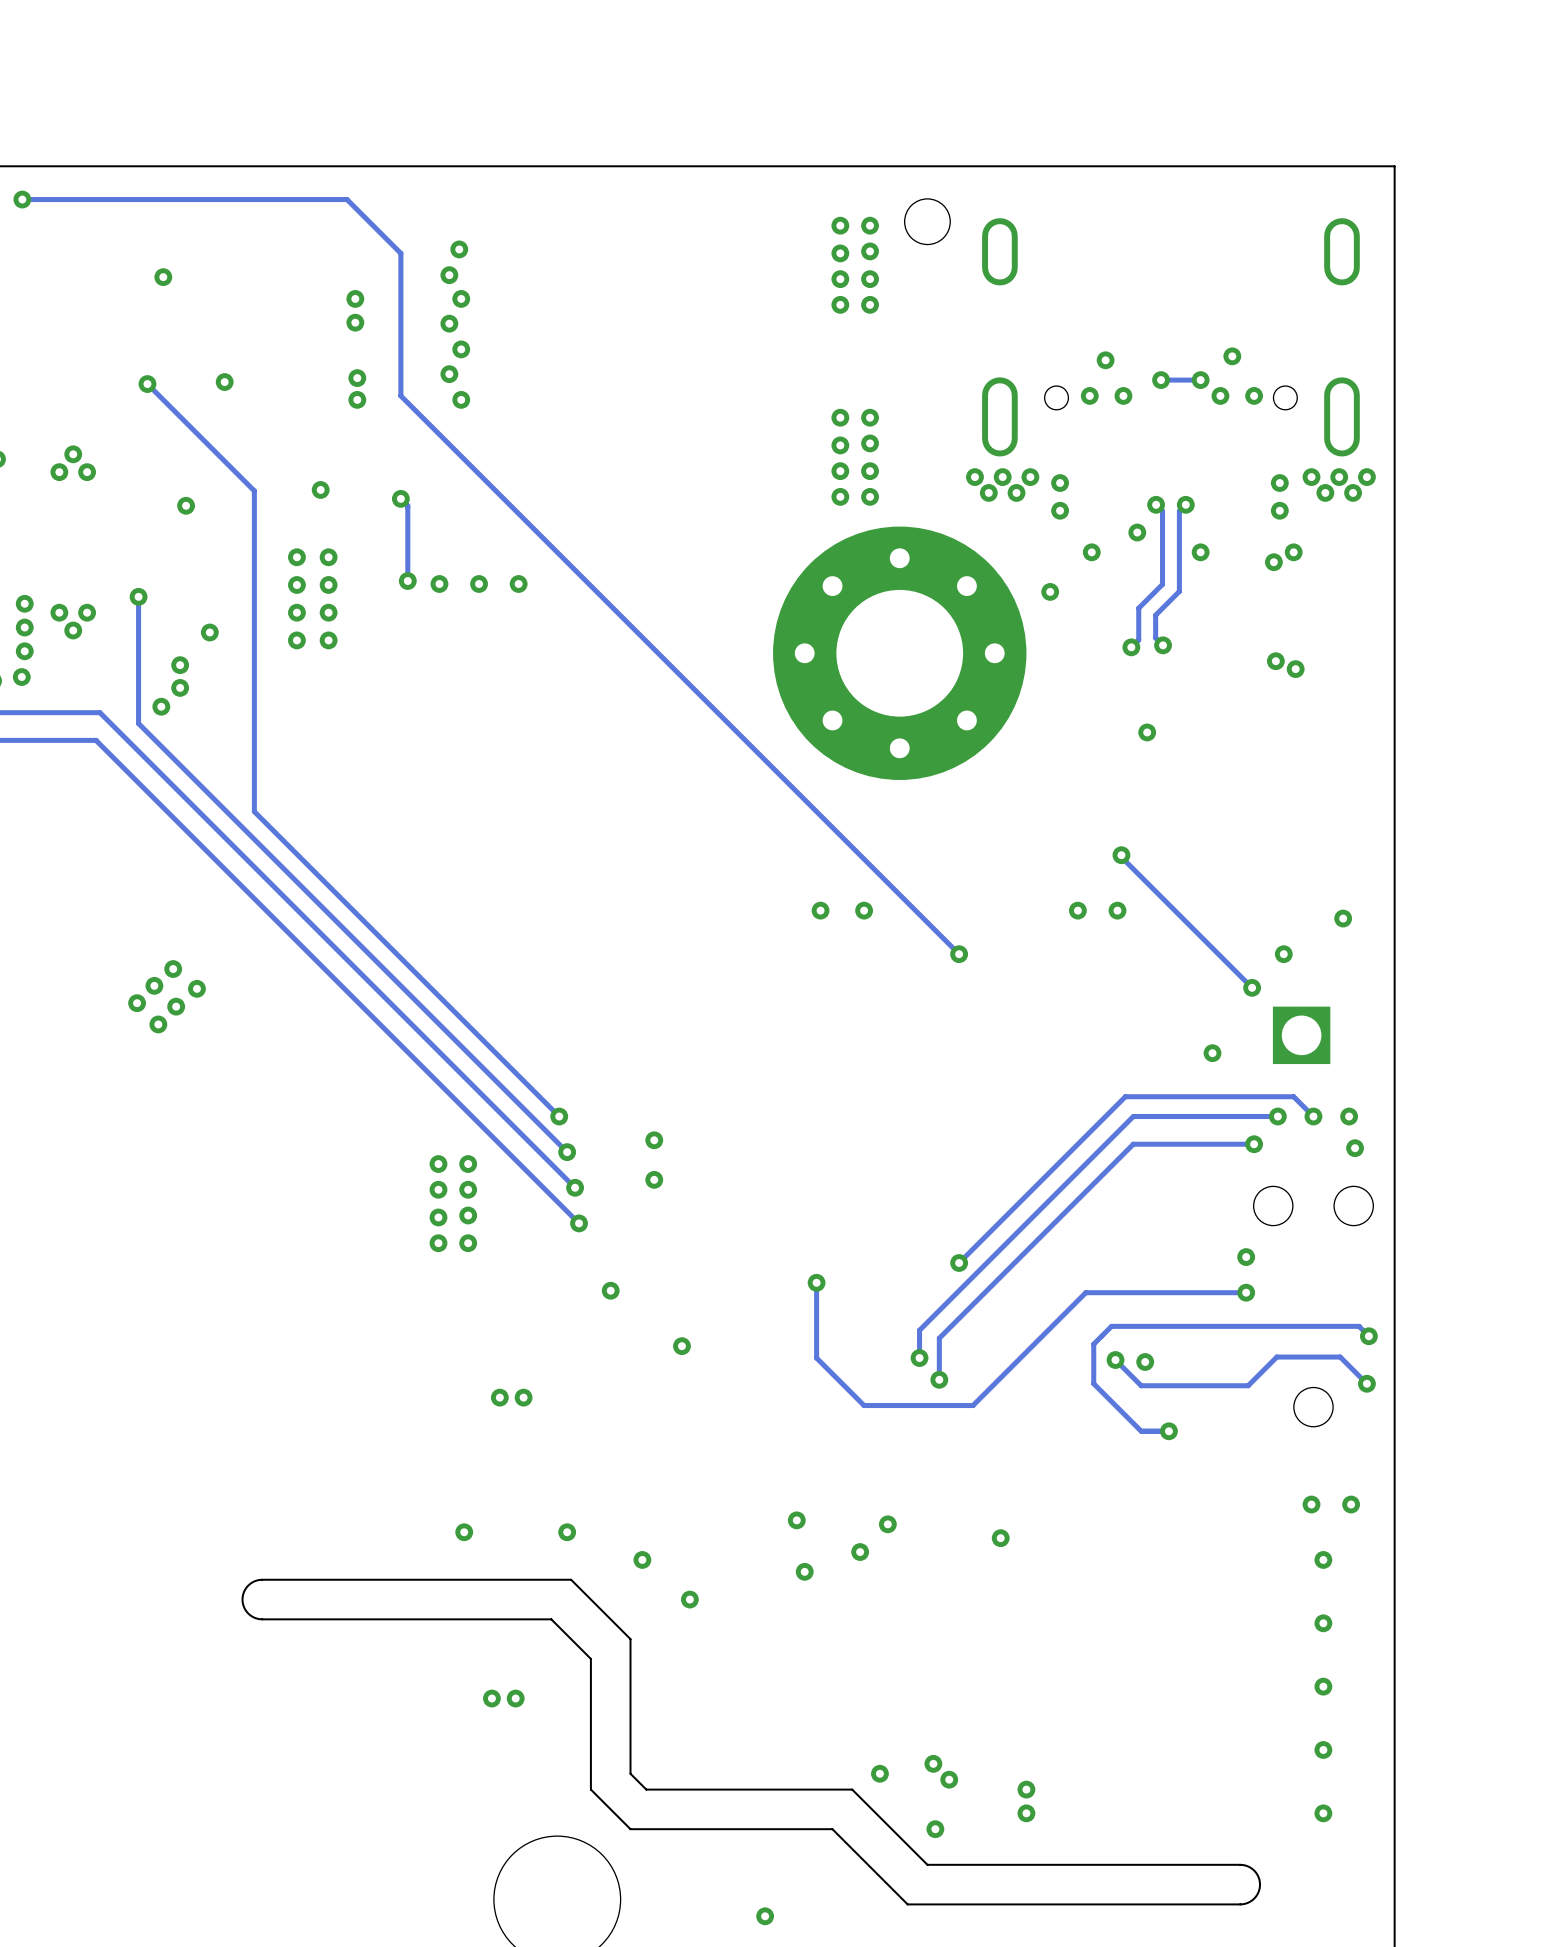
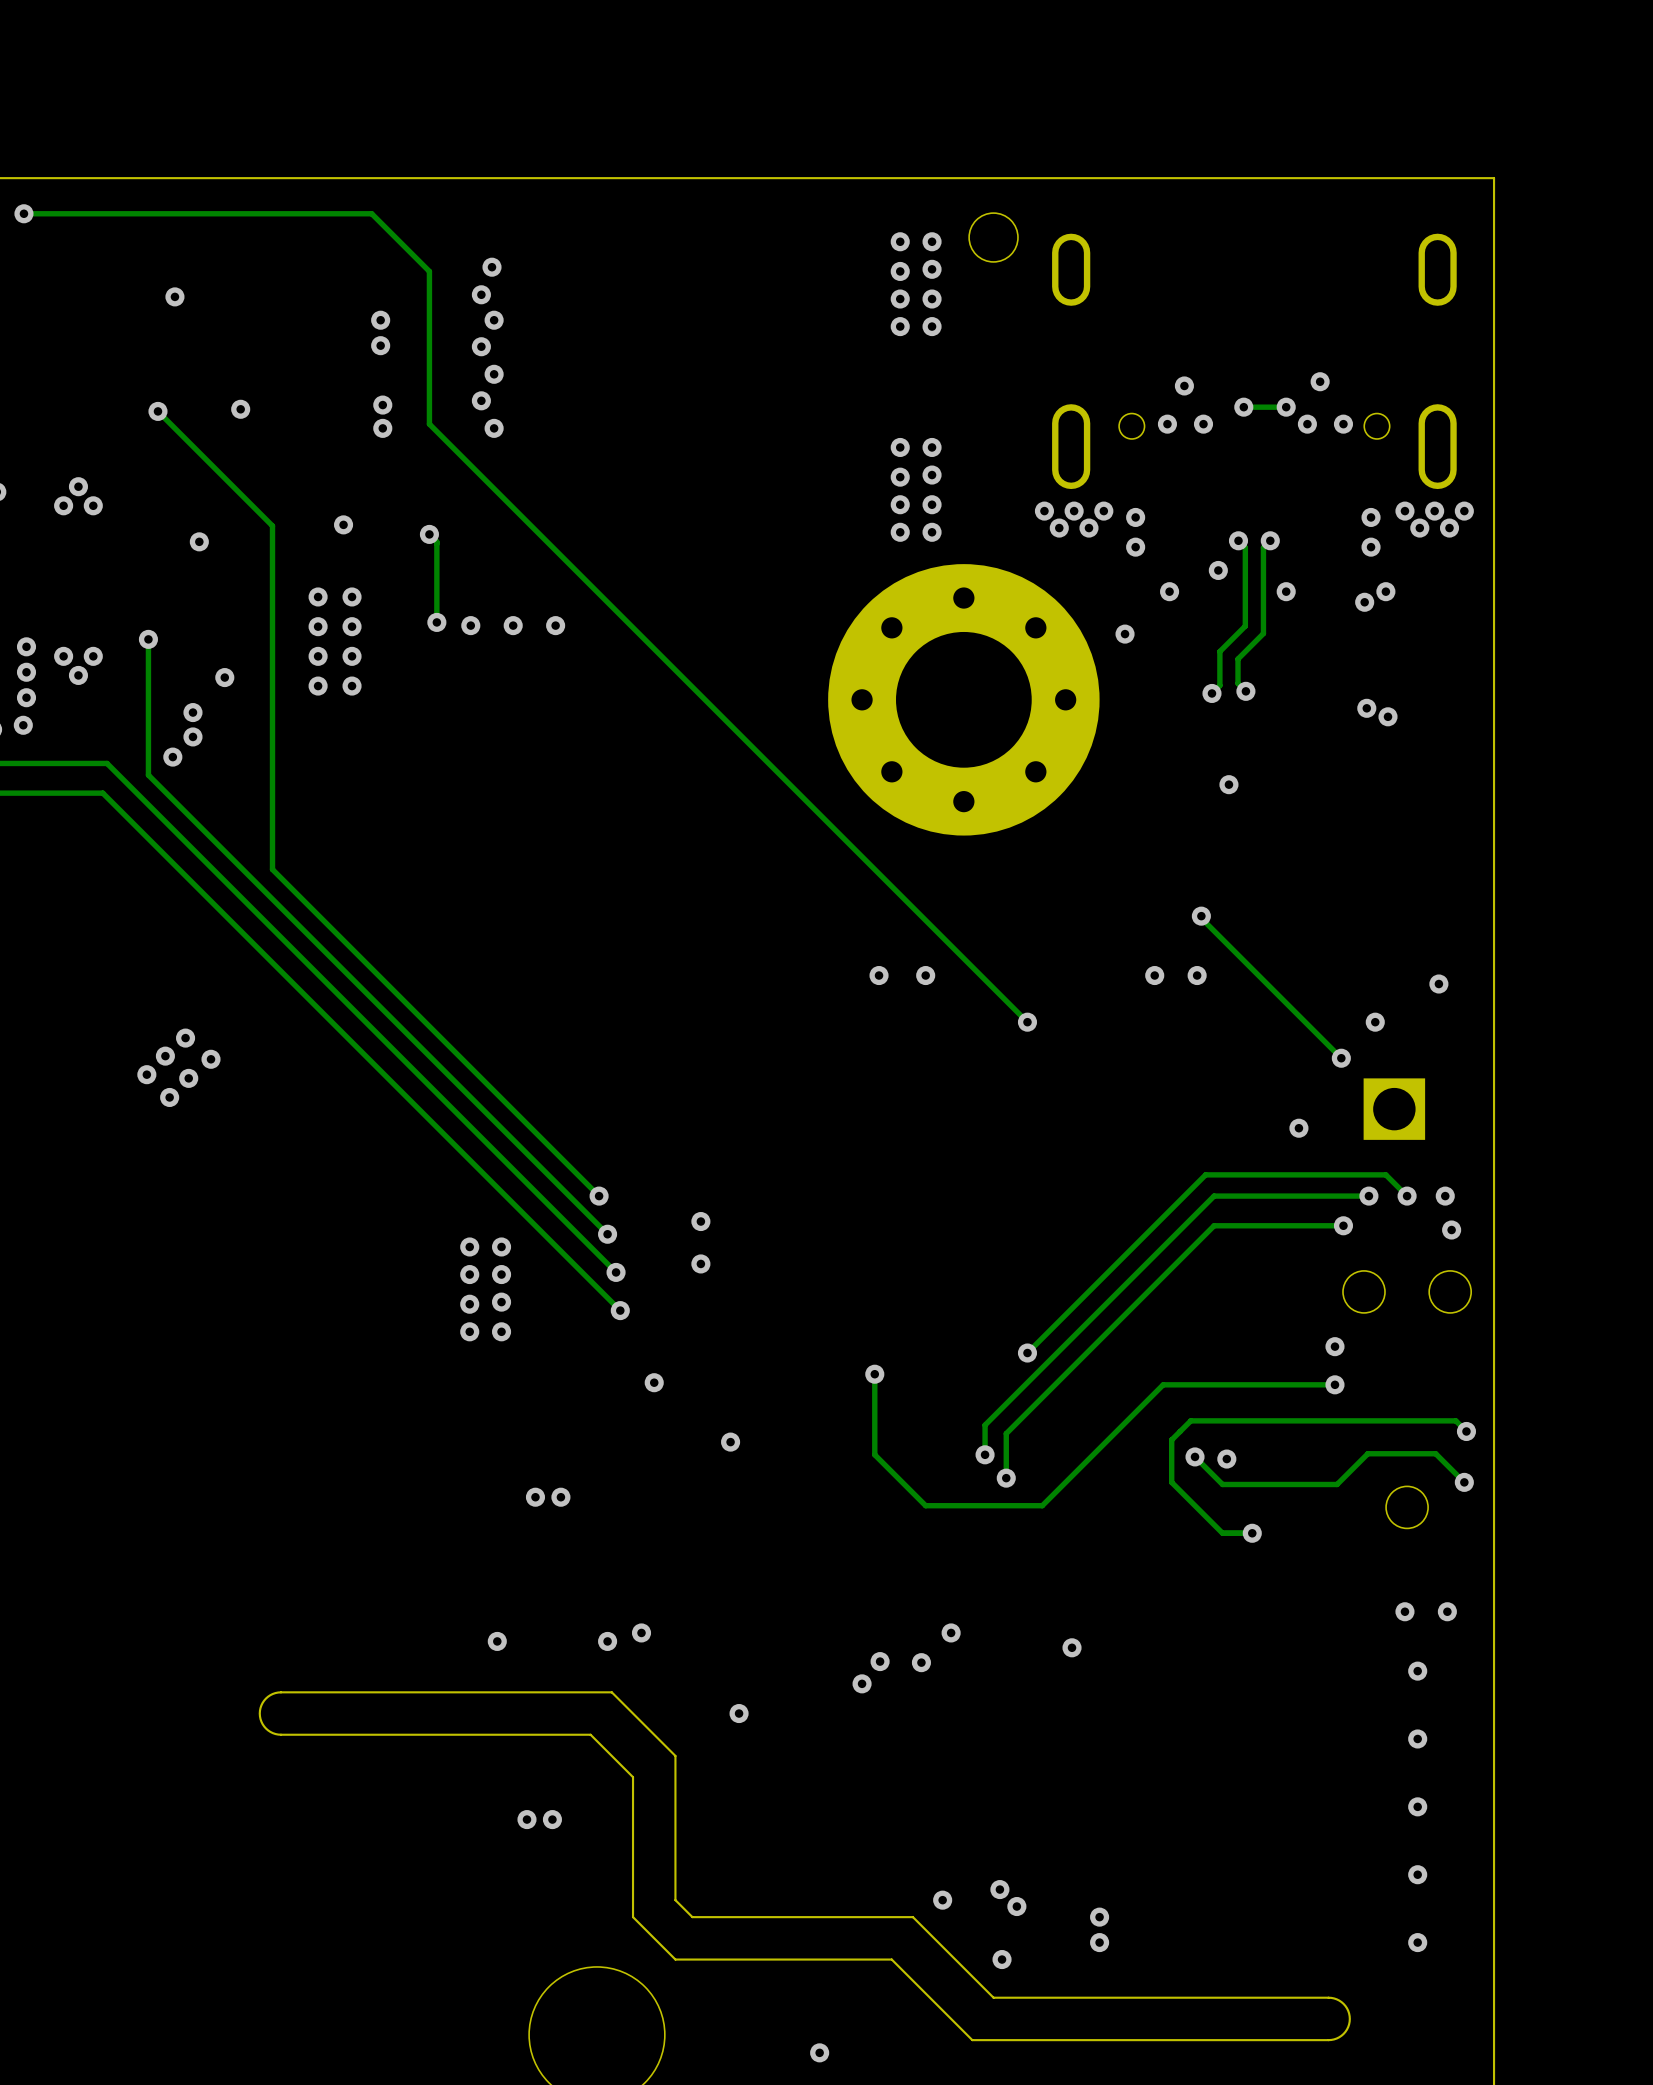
via position: (796, 1520) -> (880, 1661)
via position: (642, 1559) -> (641, 1632)

